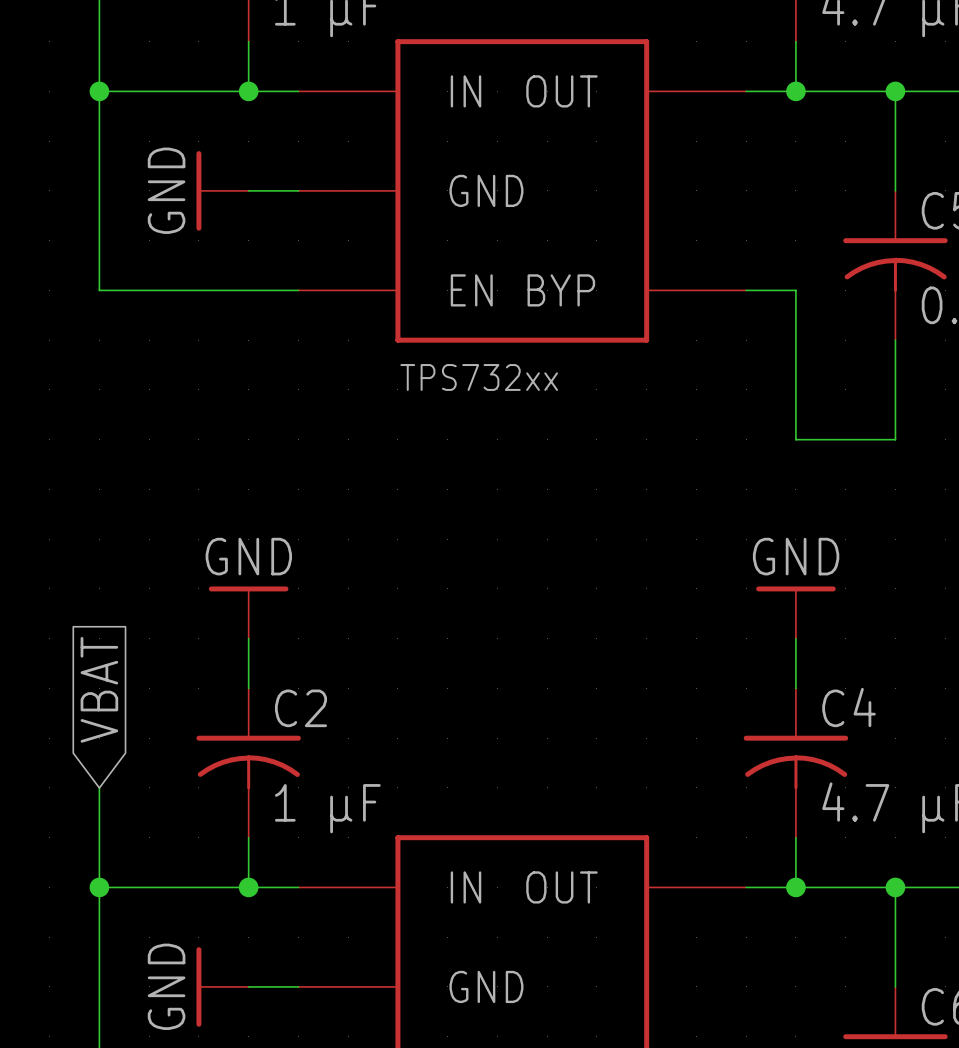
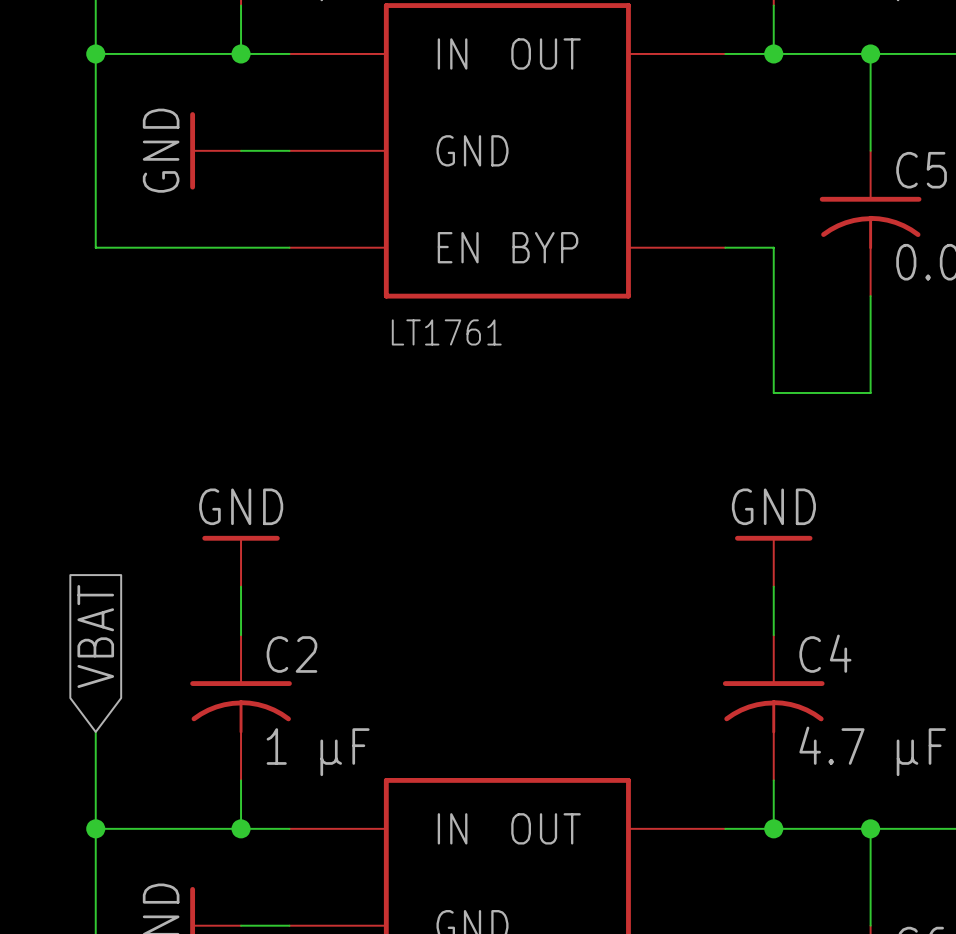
part text: TPS732xx (479, 377) -> LT1761 (446, 332)

